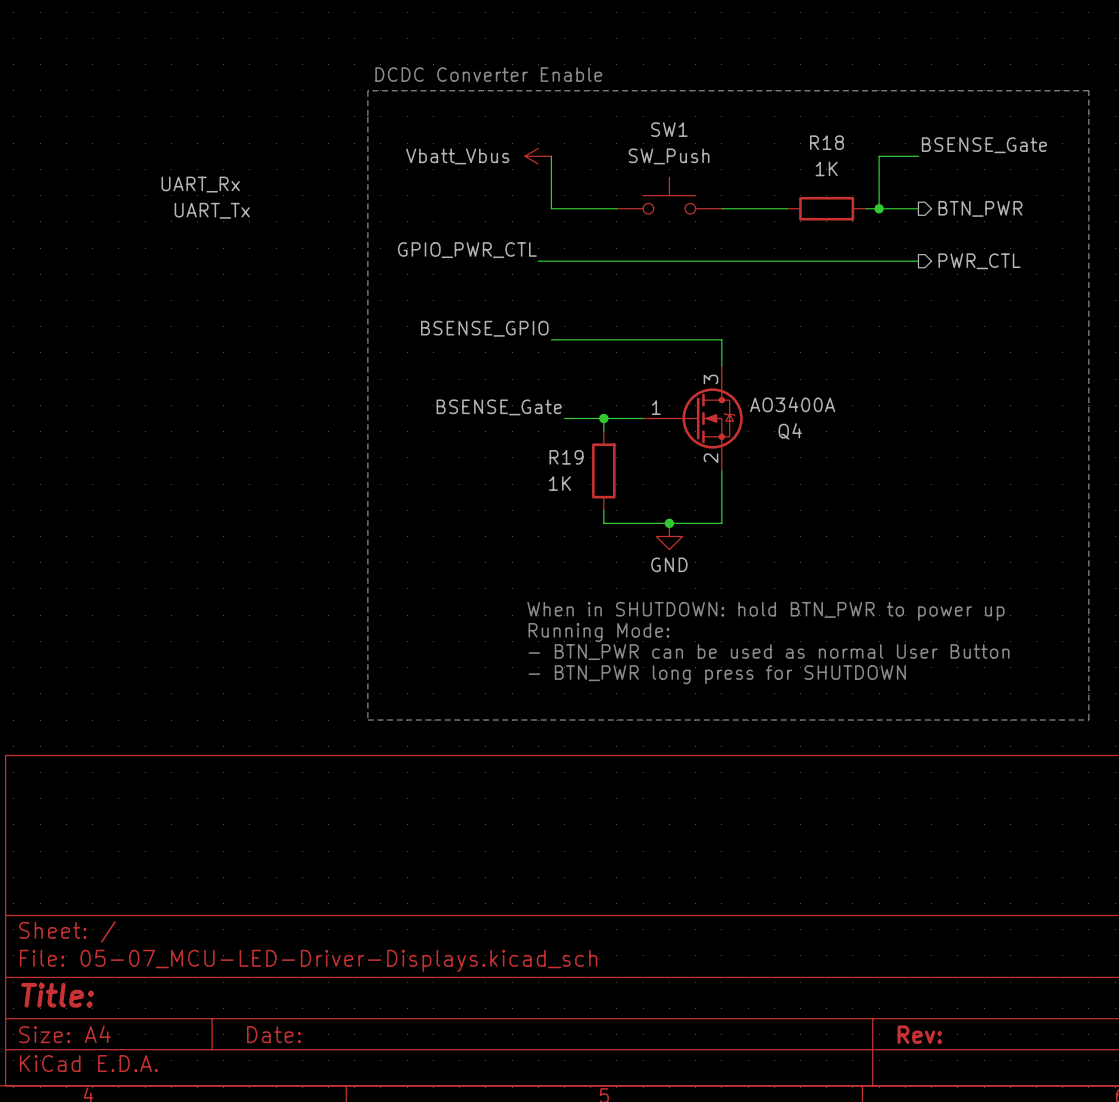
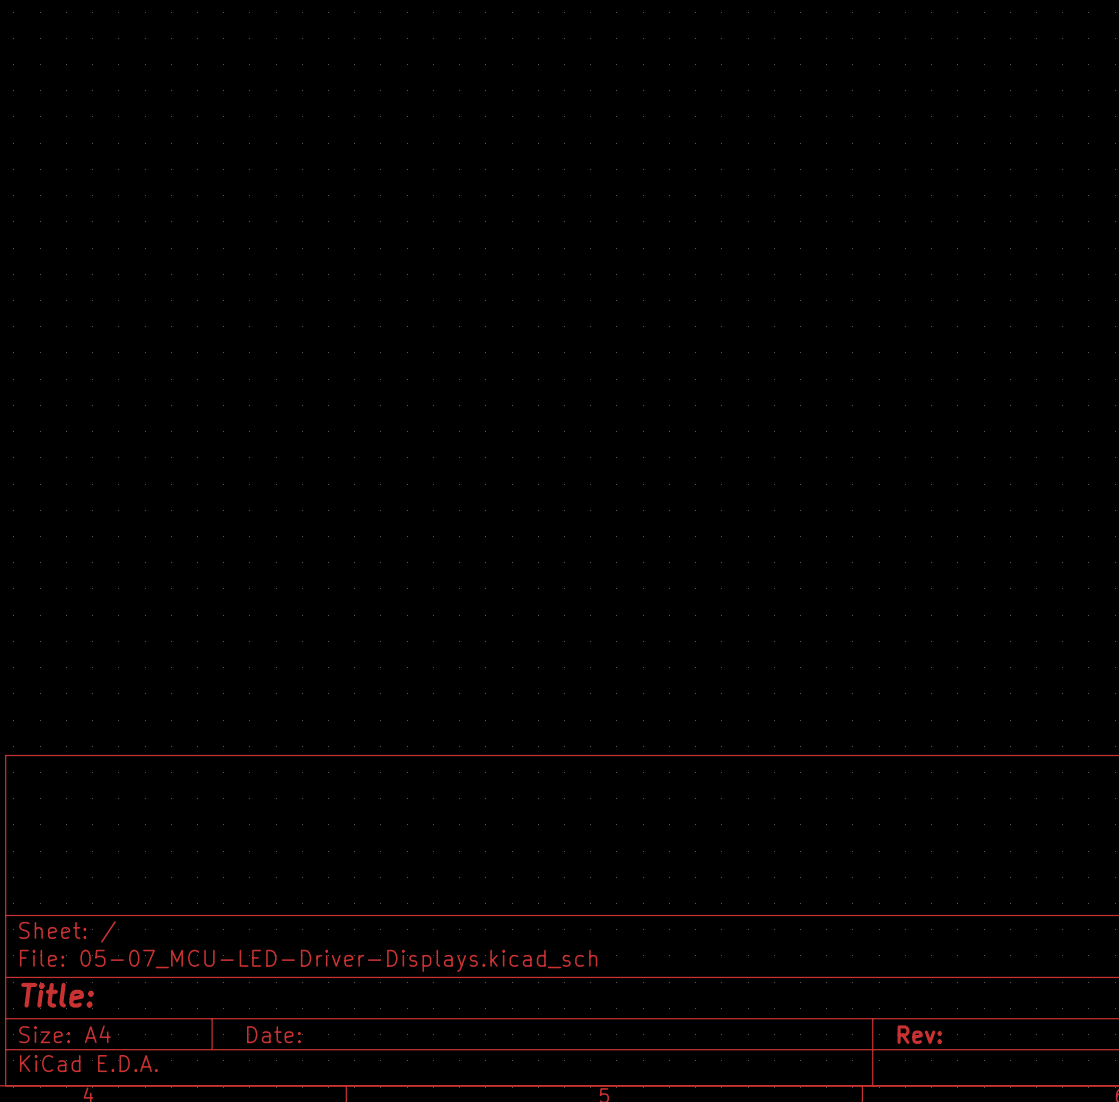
text: DCDC Converter Enable (488, 74) -> none
line: (367, 90) (367, 720) (1088, 720) (1088, 90) (367, 90) -> none
label: BSENSE_Gate (984, 145) -> none
power symbol: Vbatt_Vbus (538, 156) -> none
wire: (551, 156) (551, 208) (616, 208) -> none
wire: (918, 156) (879, 156) (879, 208) -> none
label: UART_Rx (200, 184) -> none
SW1: SW_Push (669, 195) -> none
wire: (721, 208) (787, 208) -> none
R18: 1K (826, 208) -> none
wire: (866, 208) (918, 208) -> none
junction: (879, 208) -> none
hierarchical label: BTN_PWR (980, 208) -> none
label: UART_Tx (212, 210) -> none
label: GPIO_PWR_CTL (467, 250) -> none
wire: (538, 261) (918, 261) -> none
hierarchical label: PWR_CTL (979, 261) -> none
label: BSENSE_GPIO (484, 328) -> none
wire: (551, 339) (721, 339) (721, 366) -> none
label: BSENSE_Gate (499, 407) -> none
wire: (564, 418) (643, 418) -> none
wire: (603, 418) (603, 431) -> none
junction: (603, 418) -> none
Q4: AO3400A (692, 418) -> none
R19: 1K (603, 470) -> none
wire: (721, 470) (721, 523) (603, 523) (603, 510) -> none
junction: (669, 523) -> none
power symbol: GND (669, 536) -> none
text: When in SHUTDOWN: hold BTN_PWR to power up (765, 611) -> none
text: Running Mode: (598, 632) -> none
text: - BTN_PWR can be used as normal User Button (769, 652) -> none
text: - BTN_PWR long press for SHUTDOWN (717, 674) -> none

